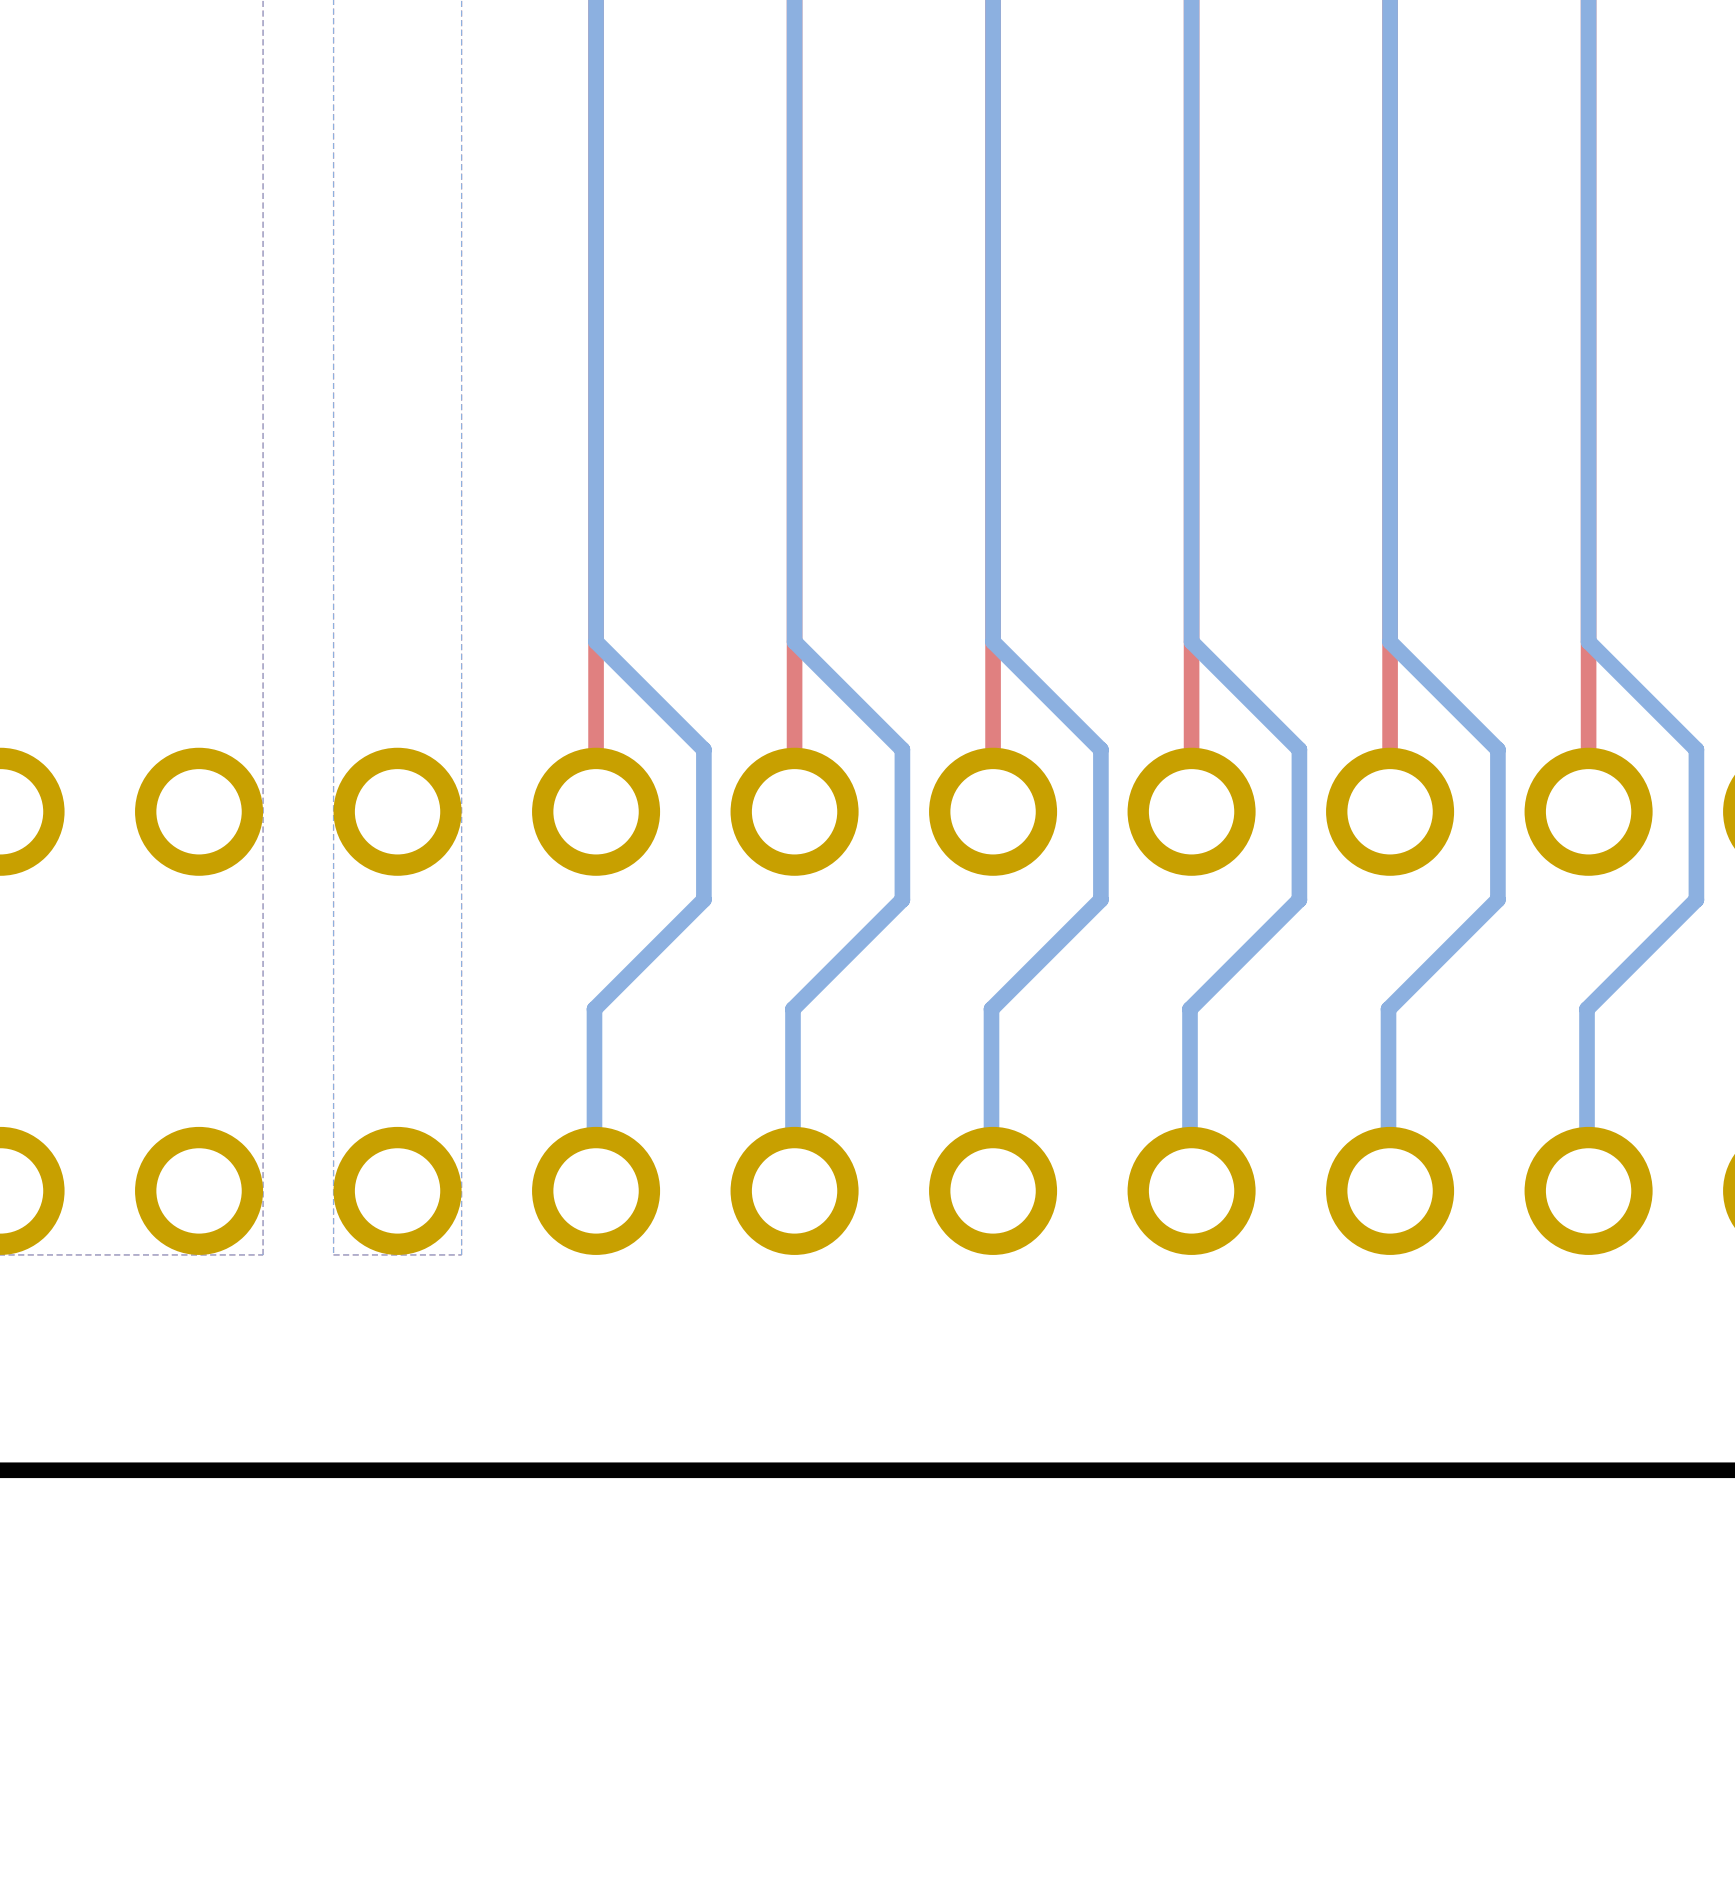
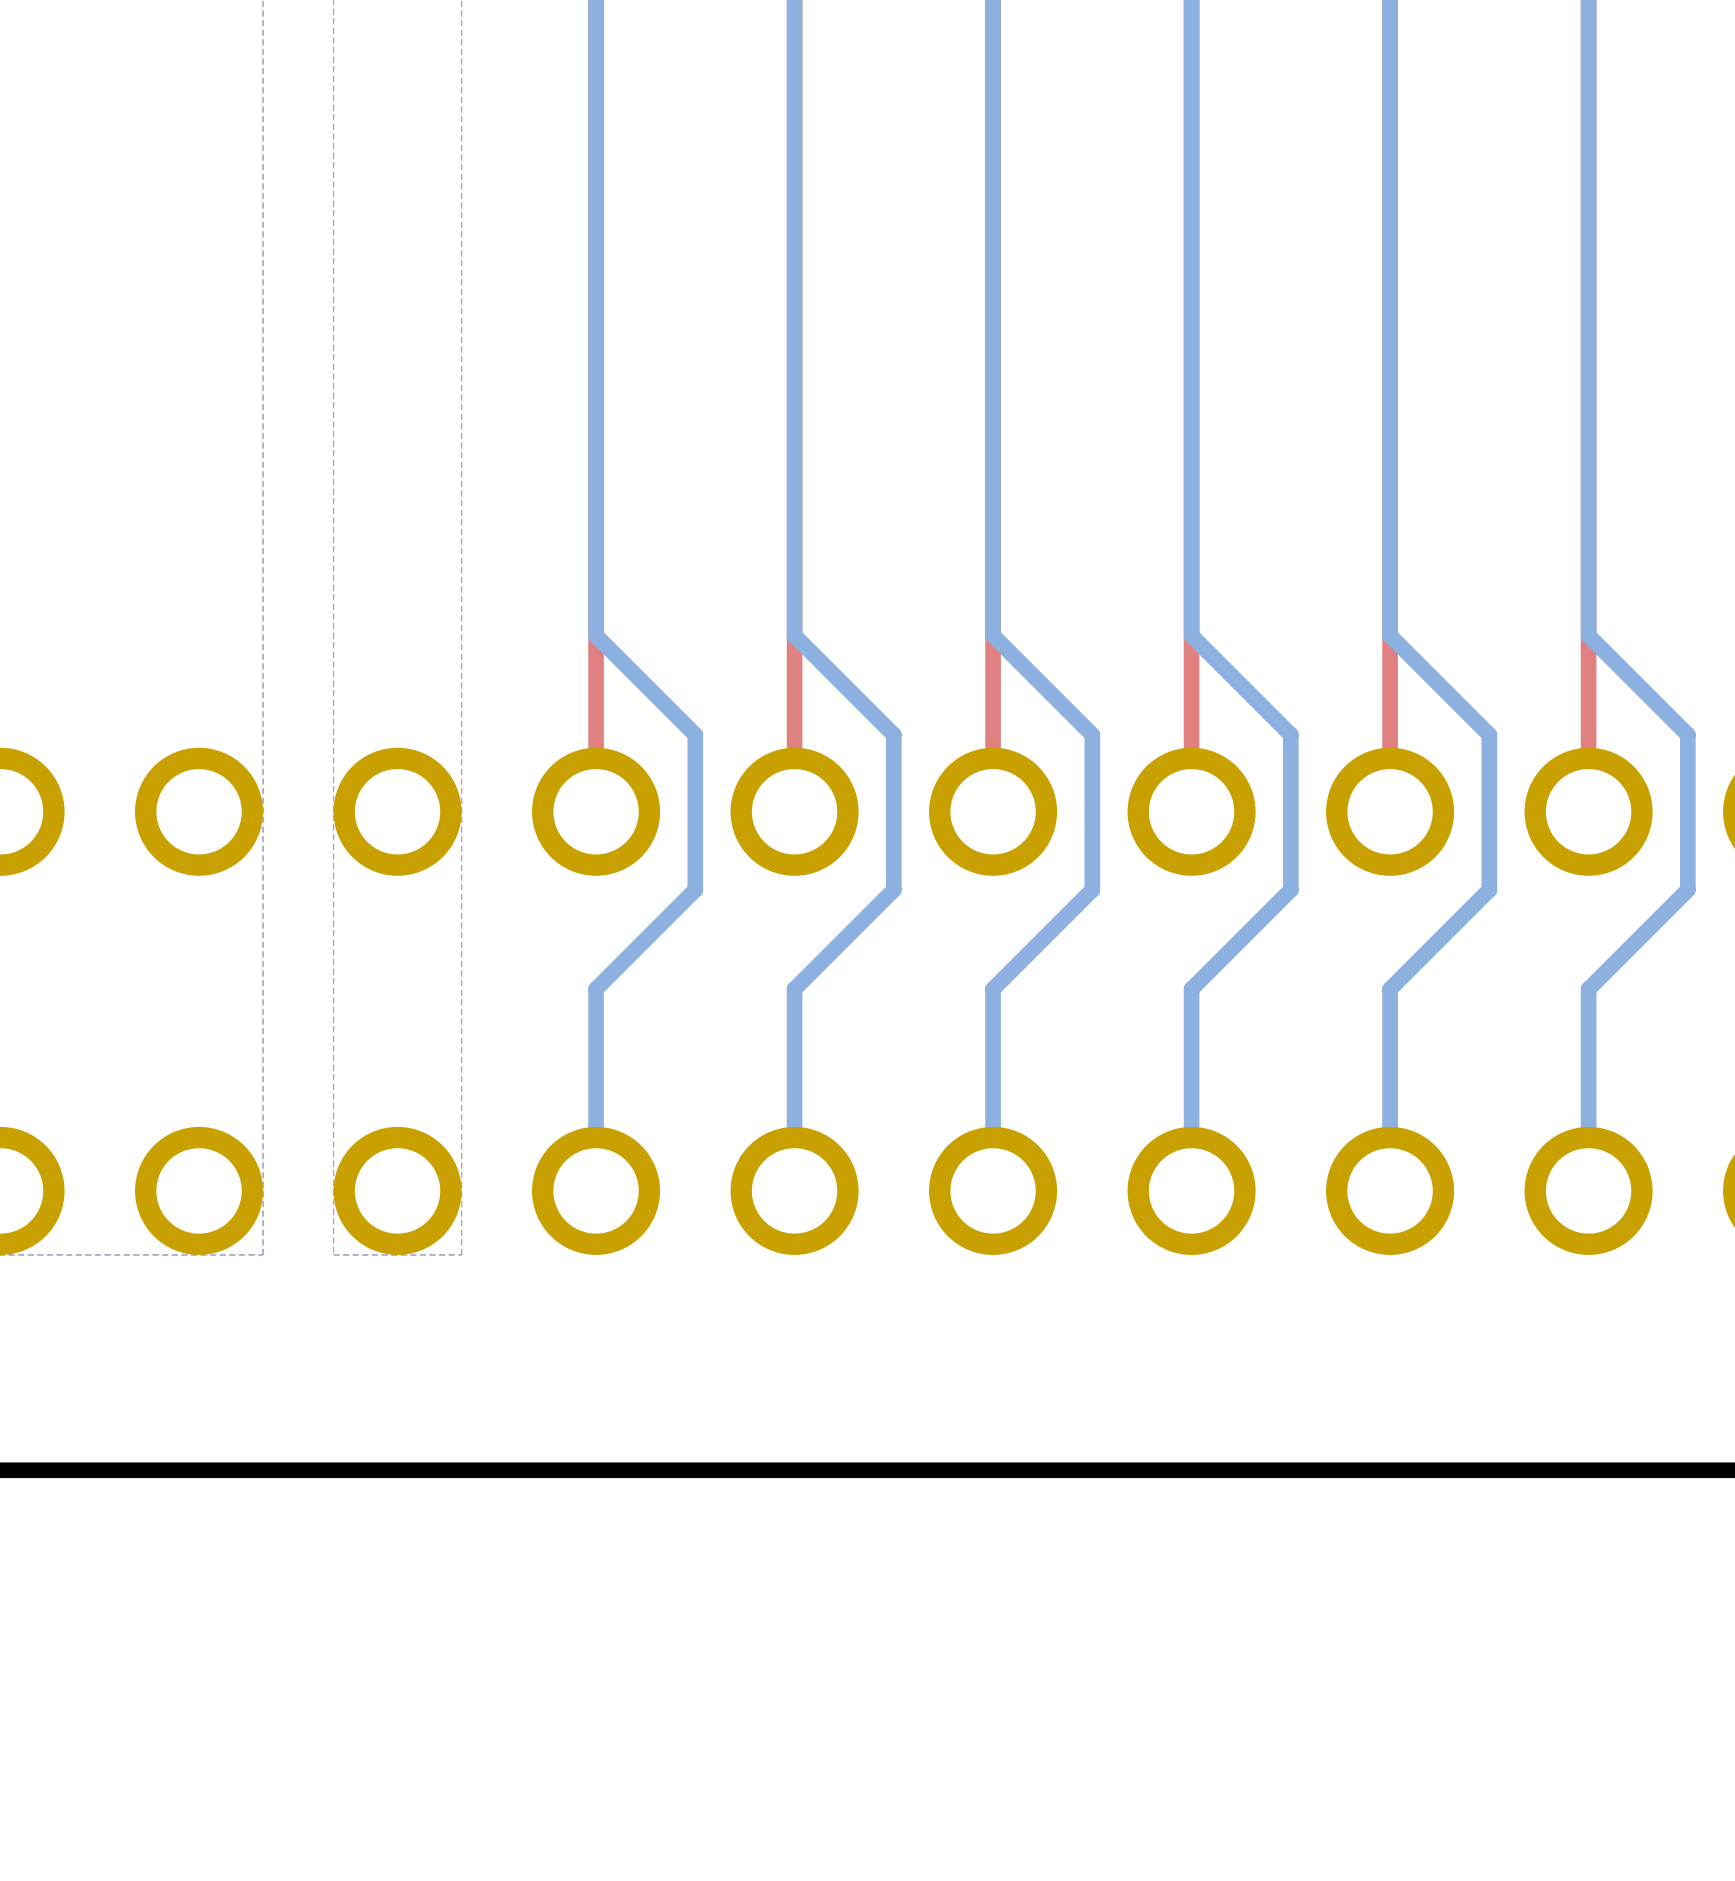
bottom track: (596, 635) (596, 641) (703, 749) (703, 899) (594, 1009) (594, 1189) -> (596, 635) (695, 734) (695, 889) (596, 989) (596, 1190)
bottom track: (794, 635) (794, 641) (902, 749) (902, 899) (792, 1009) (792, 1189) -> (794, 635) (893, 734) (893, 889) (794, 989) (794, 1190)
bottom track: (993, 635) (993, 641) (1100, 749) (1100, 899) (991, 1009) (991, 1189) -> (993, 635) (1092, 734) (1092, 889) (993, 989) (993, 1190)
bottom track: (1191, 635) (1191, 641) (1299, 749) (1299, 899) (1190, 1009) (1190, 1189) -> (1191, 635) (1290, 734) (1290, 889) (1191, 989) (1191, 1190)
bottom track: (1390, 635) (1390, 641) (1497, 749) (1497, 899) (1388, 1009) (1388, 1189) -> (1390, 635) (1489, 734) (1489, 889) (1390, 989) (1390, 1190)
bottom track: (1588, 635) (1588, 641) (1696, 749) (1696, 899) (1587, 1009) (1587, 1189) -> (1588, 635) (1687, 734) (1687, 889) (1588, 989) (1588, 1190)

